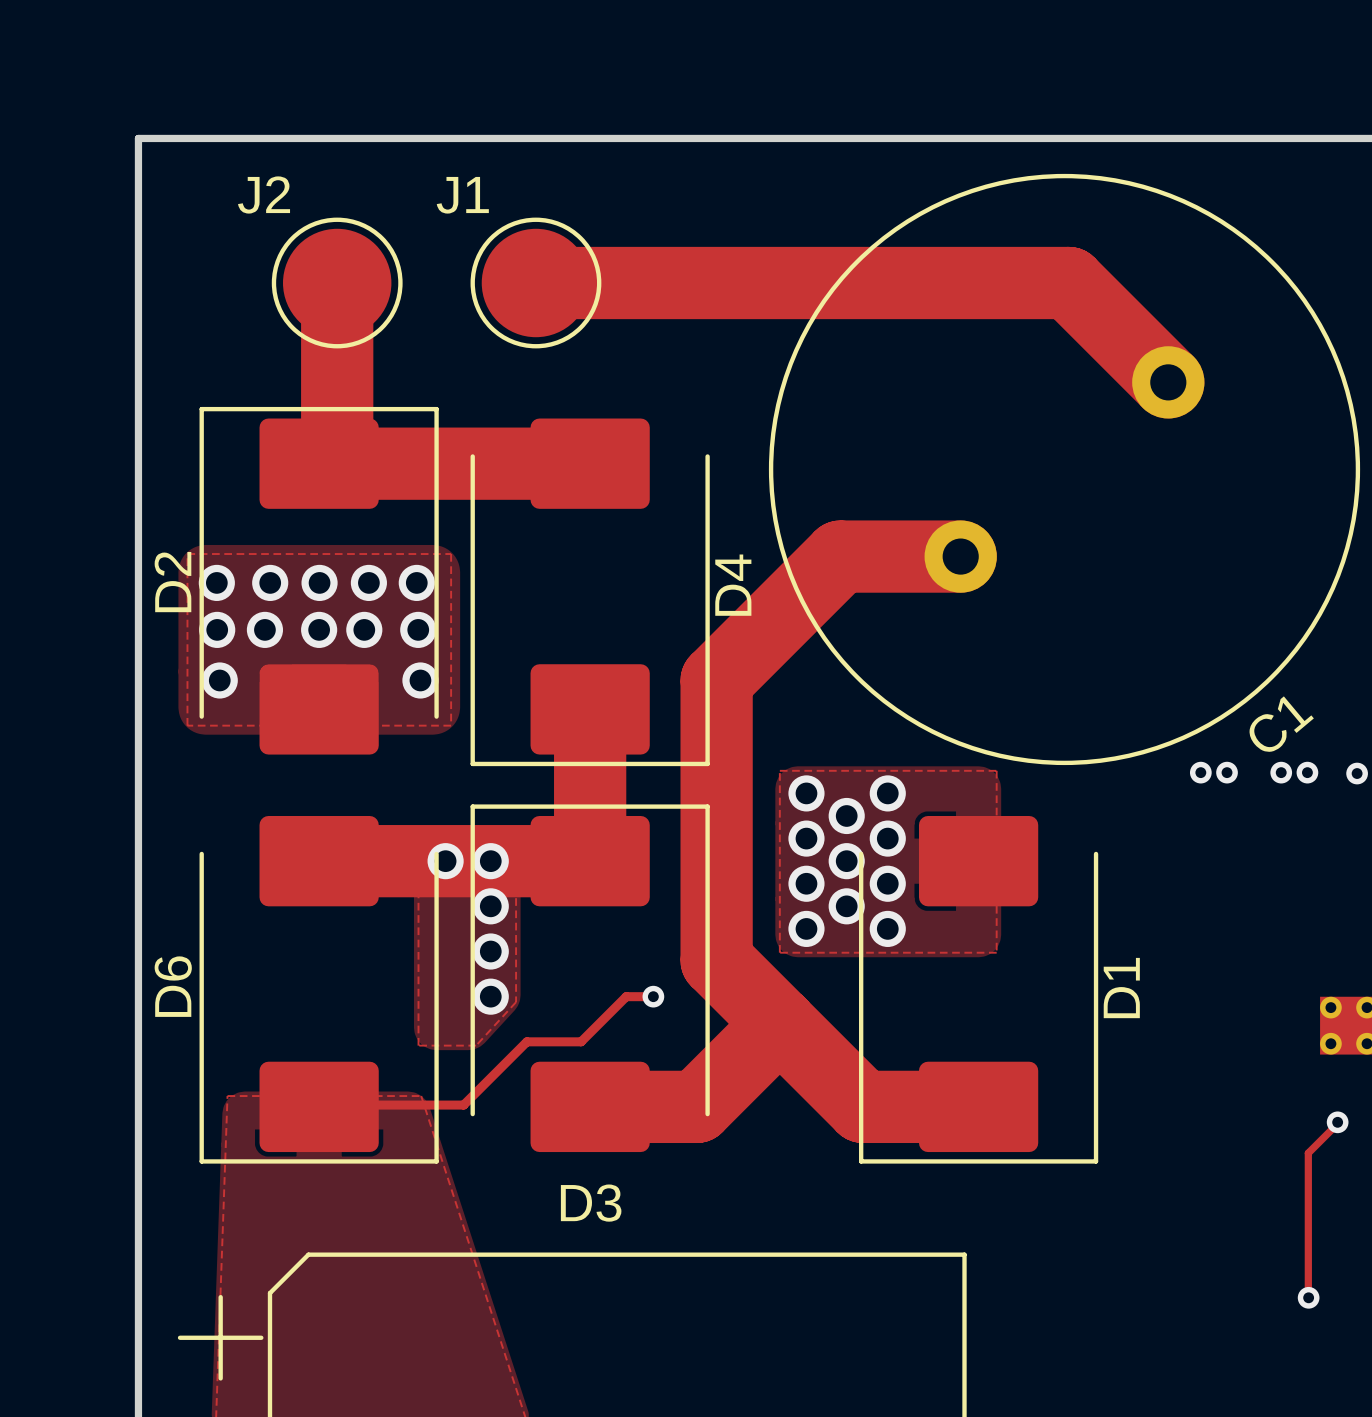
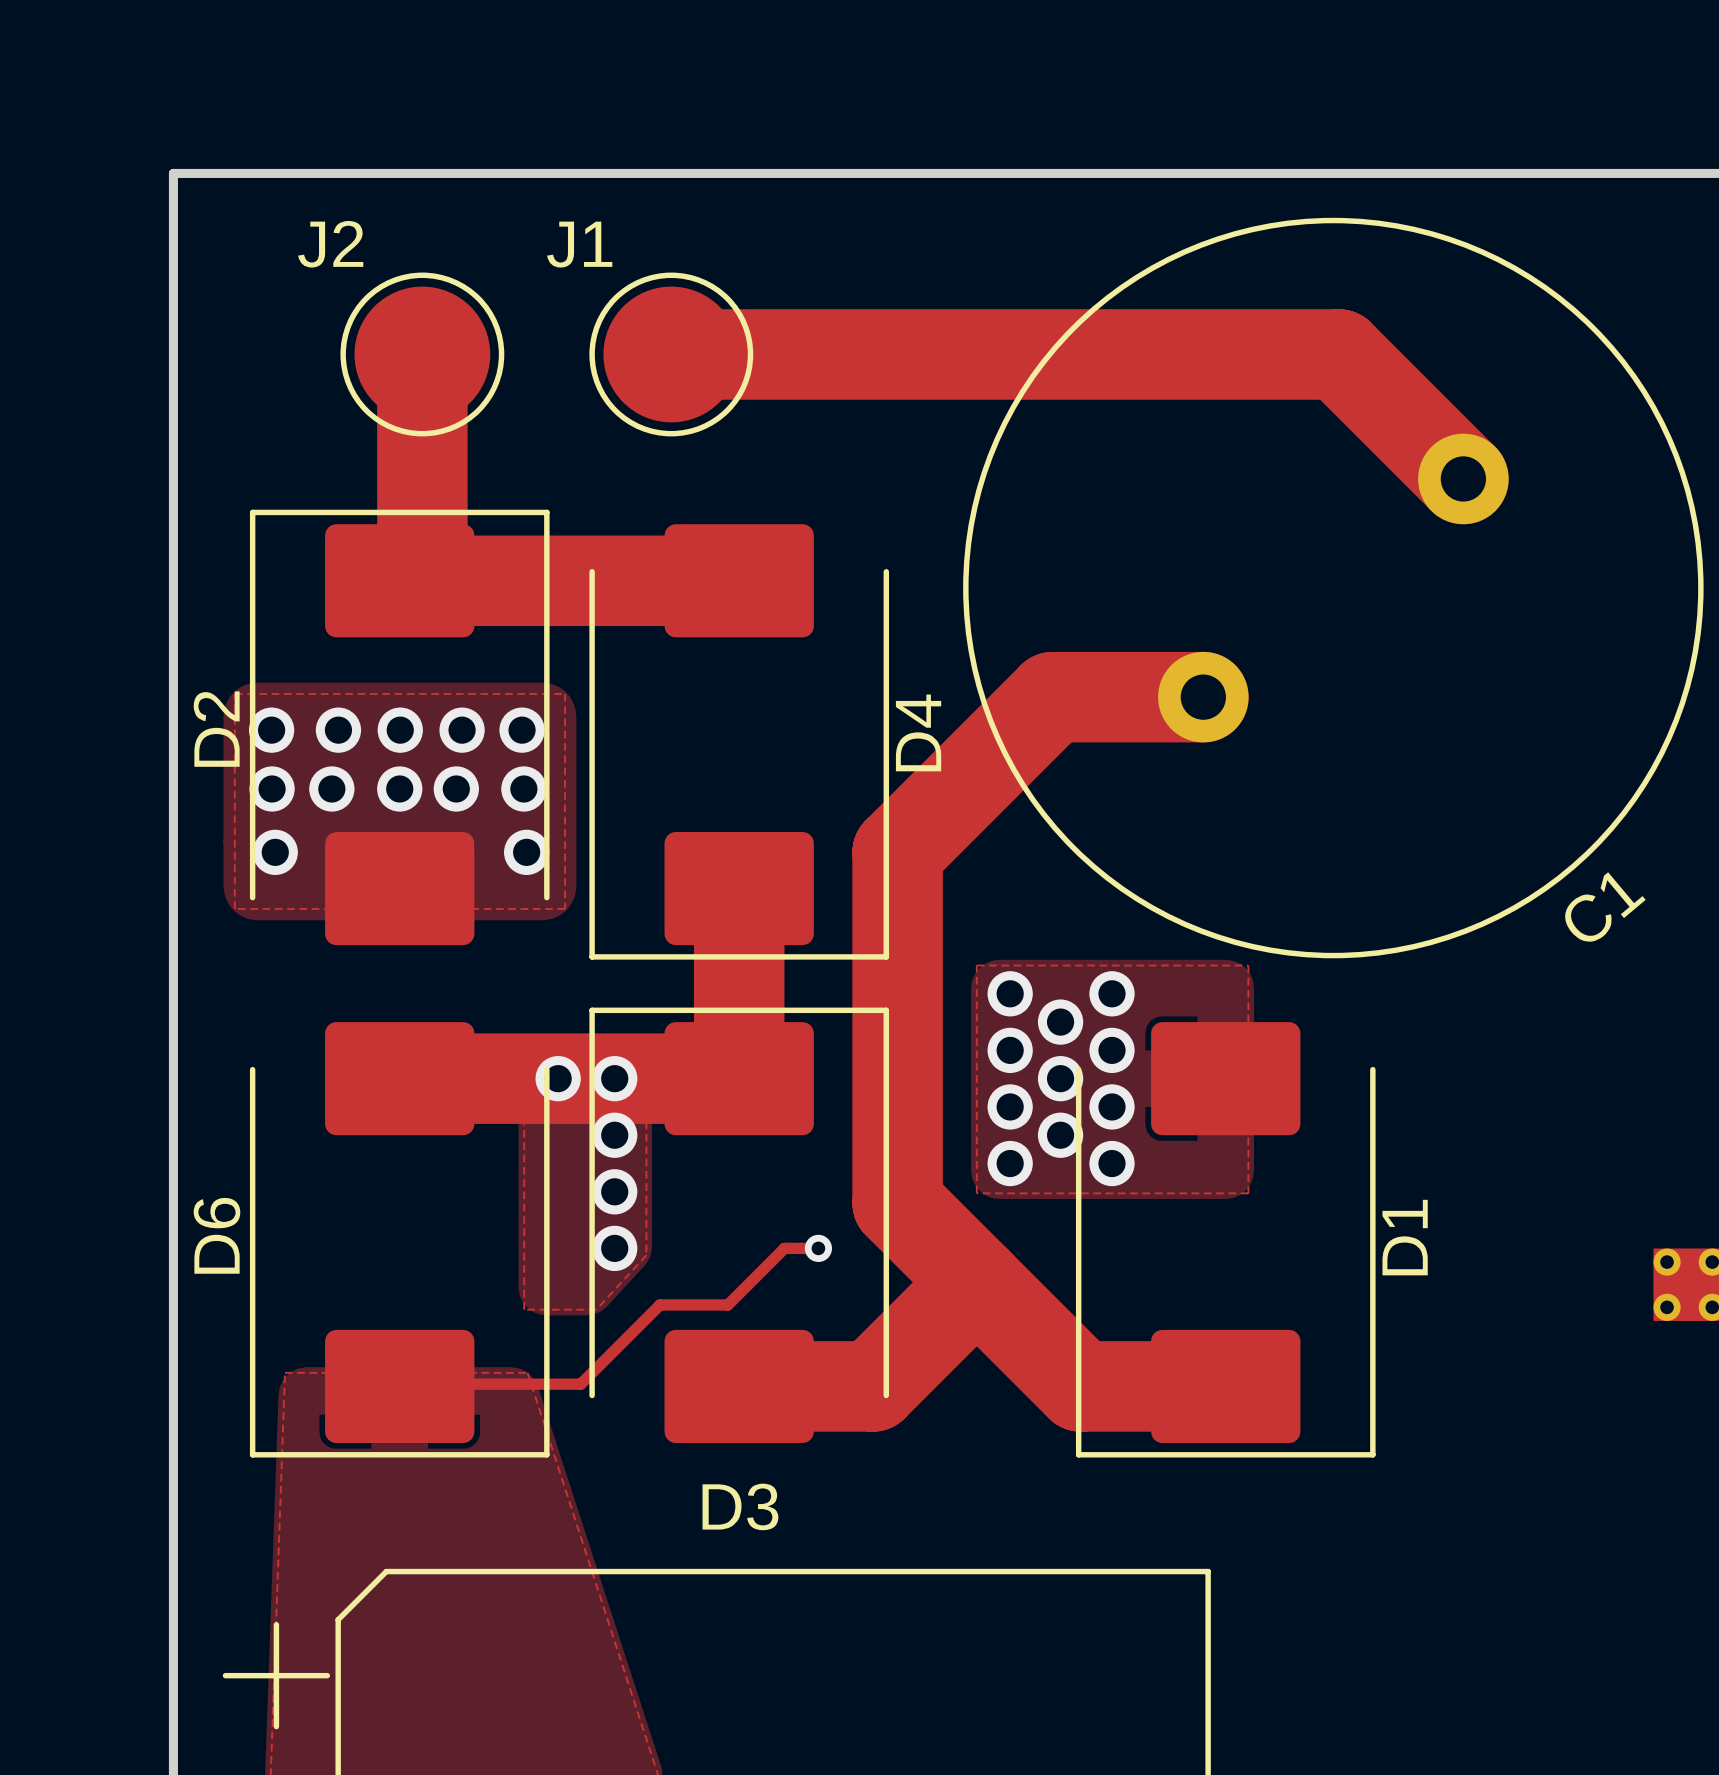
via: (1200, 772) -> none
via: (1227, 772) -> none
via: (1281, 772) -> none
via: (1307, 772) -> none
via: (1357, 773) -> none
track: (1337, 1122) (1308, 1153) (1308, 1297) -> none
via: (1337, 1122) -> none
via: (1308, 1297) -> none

